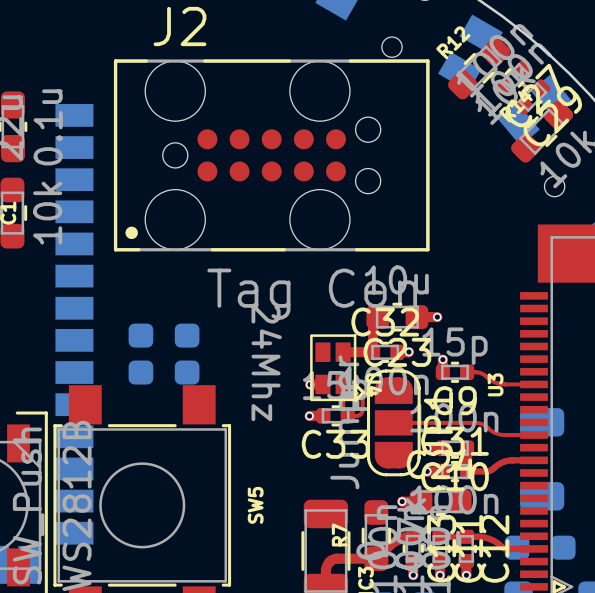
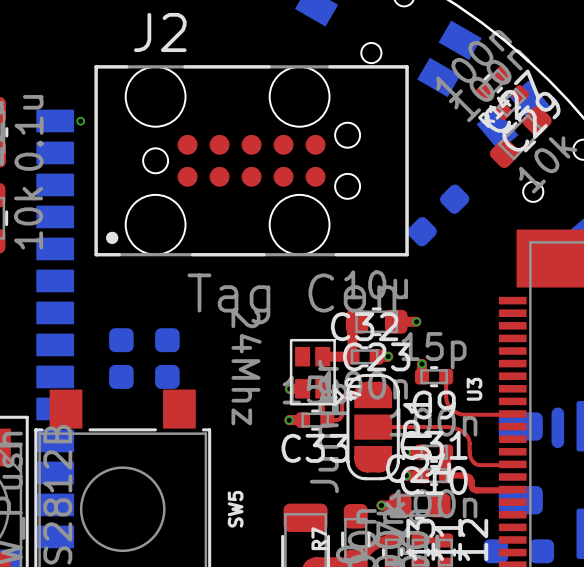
R12 side: top (479, 68) -> bottom (438, 215)
via: none -> (80, 121)
top track: (467, 372) (481, 373) (499, 383) (534, 384) -> (446, 376) (446, 401) (455, 412) (465, 414) (510, 414)
bottom track: none -> (557, 413) (557, 441)
top track: (468, 422) (482, 424) (493, 431) (501, 434) (534, 435) -> (447, 427) (457, 429) (466, 435) (469, 442) (470, 456) (475, 463) (510, 465)
top track: (534, 460) (507, 460) (485, 471) -> (510, 490) (475, 490) (472, 487) (470, 478) (463, 475)
top track: (466, 536) (487, 538) (506, 548) (534, 548) -> none

